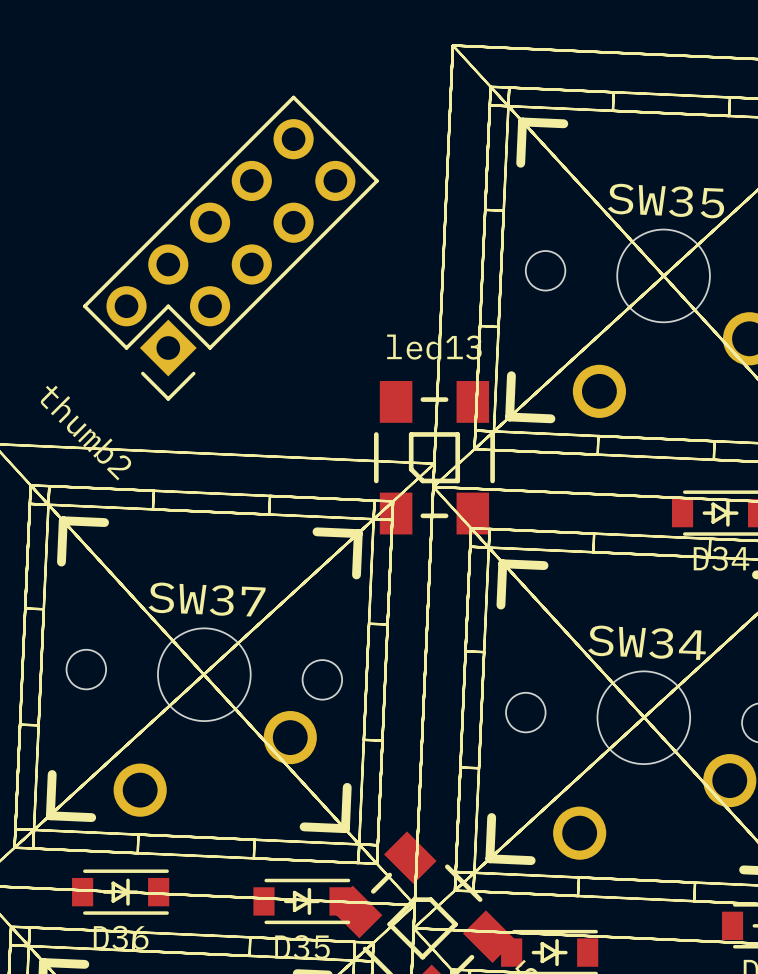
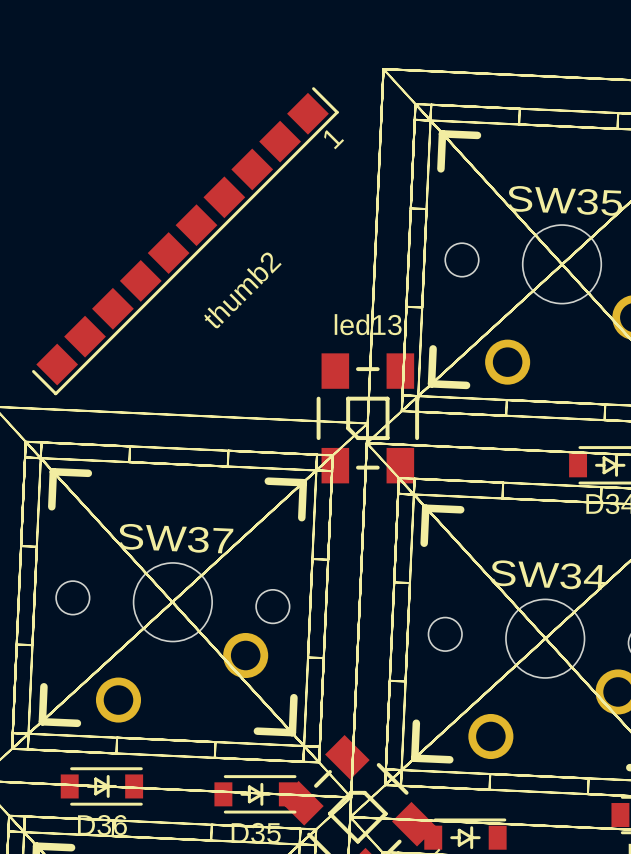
thumb2 footprint: [83, 95, 379, 401] -> [32, 87, 339, 396]
thumb2 name position: thumb2 (85, 433) -> thumb2 (242, 290)

